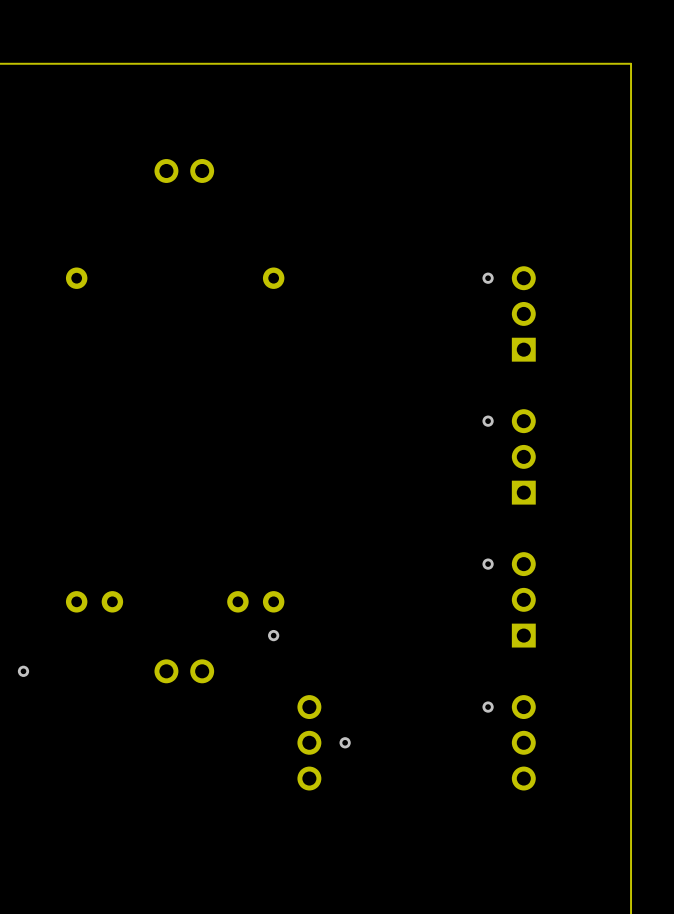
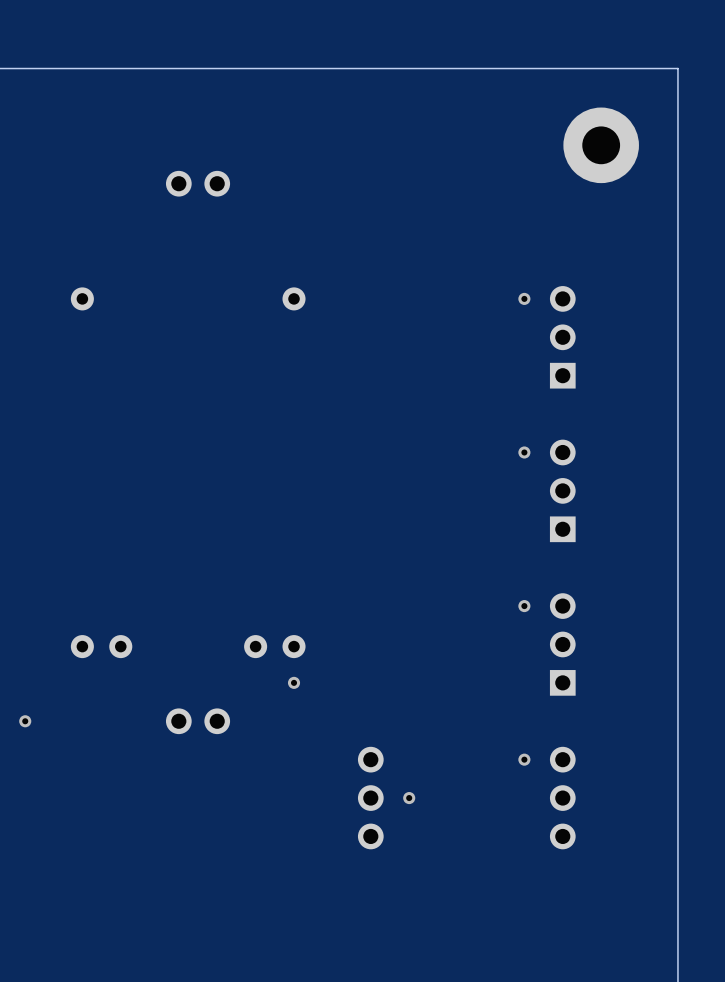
part: none -> (601, 145)
part position: (309, 742) -> (370, 798)
via position: (345, 742) -> (409, 798)

